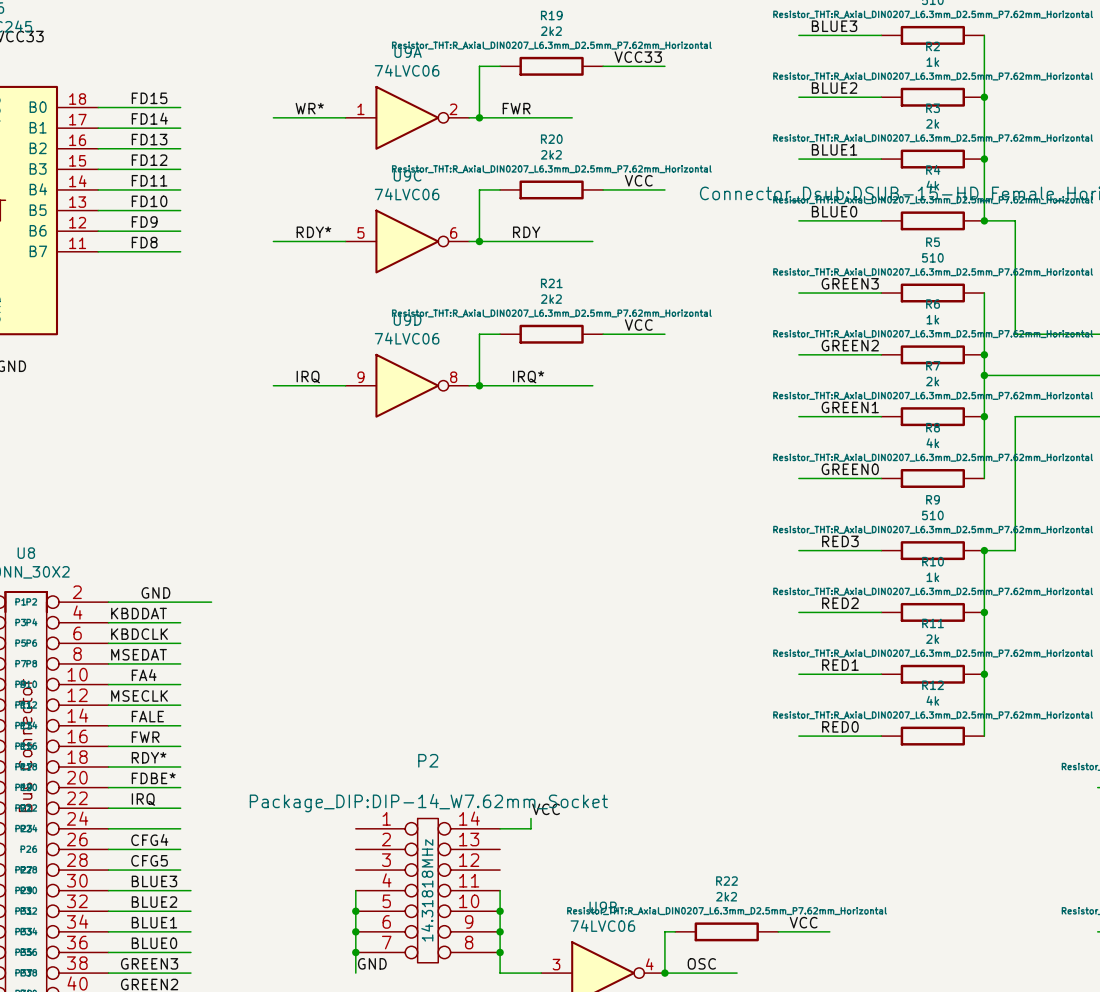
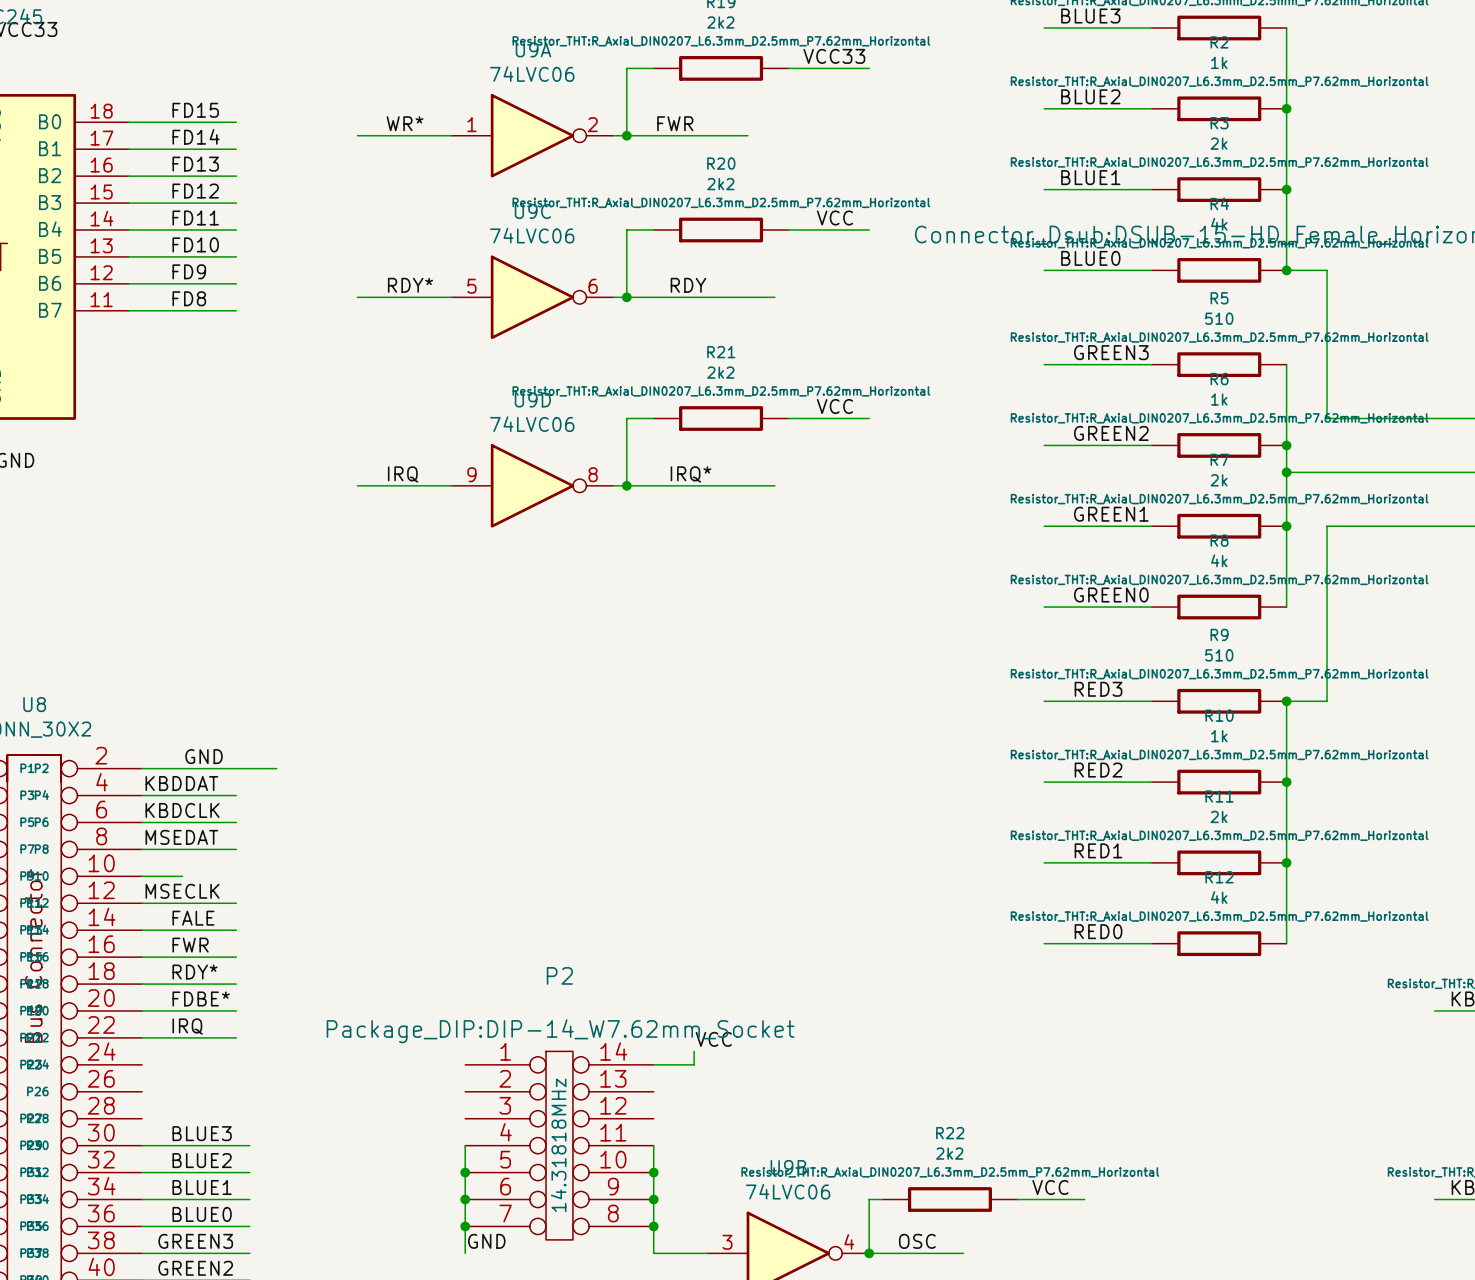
label: FA4 (144, 675) -> none
wire: (139, 684) (180, 684) -> none
wire: (108, 828) (180, 828) -> none
label: CFG4 (149, 839) -> none
wire: (108, 849) (180, 849) -> none
label: CFG5 (149, 860) -> none
wire: (108, 870) (180, 870) -> none

